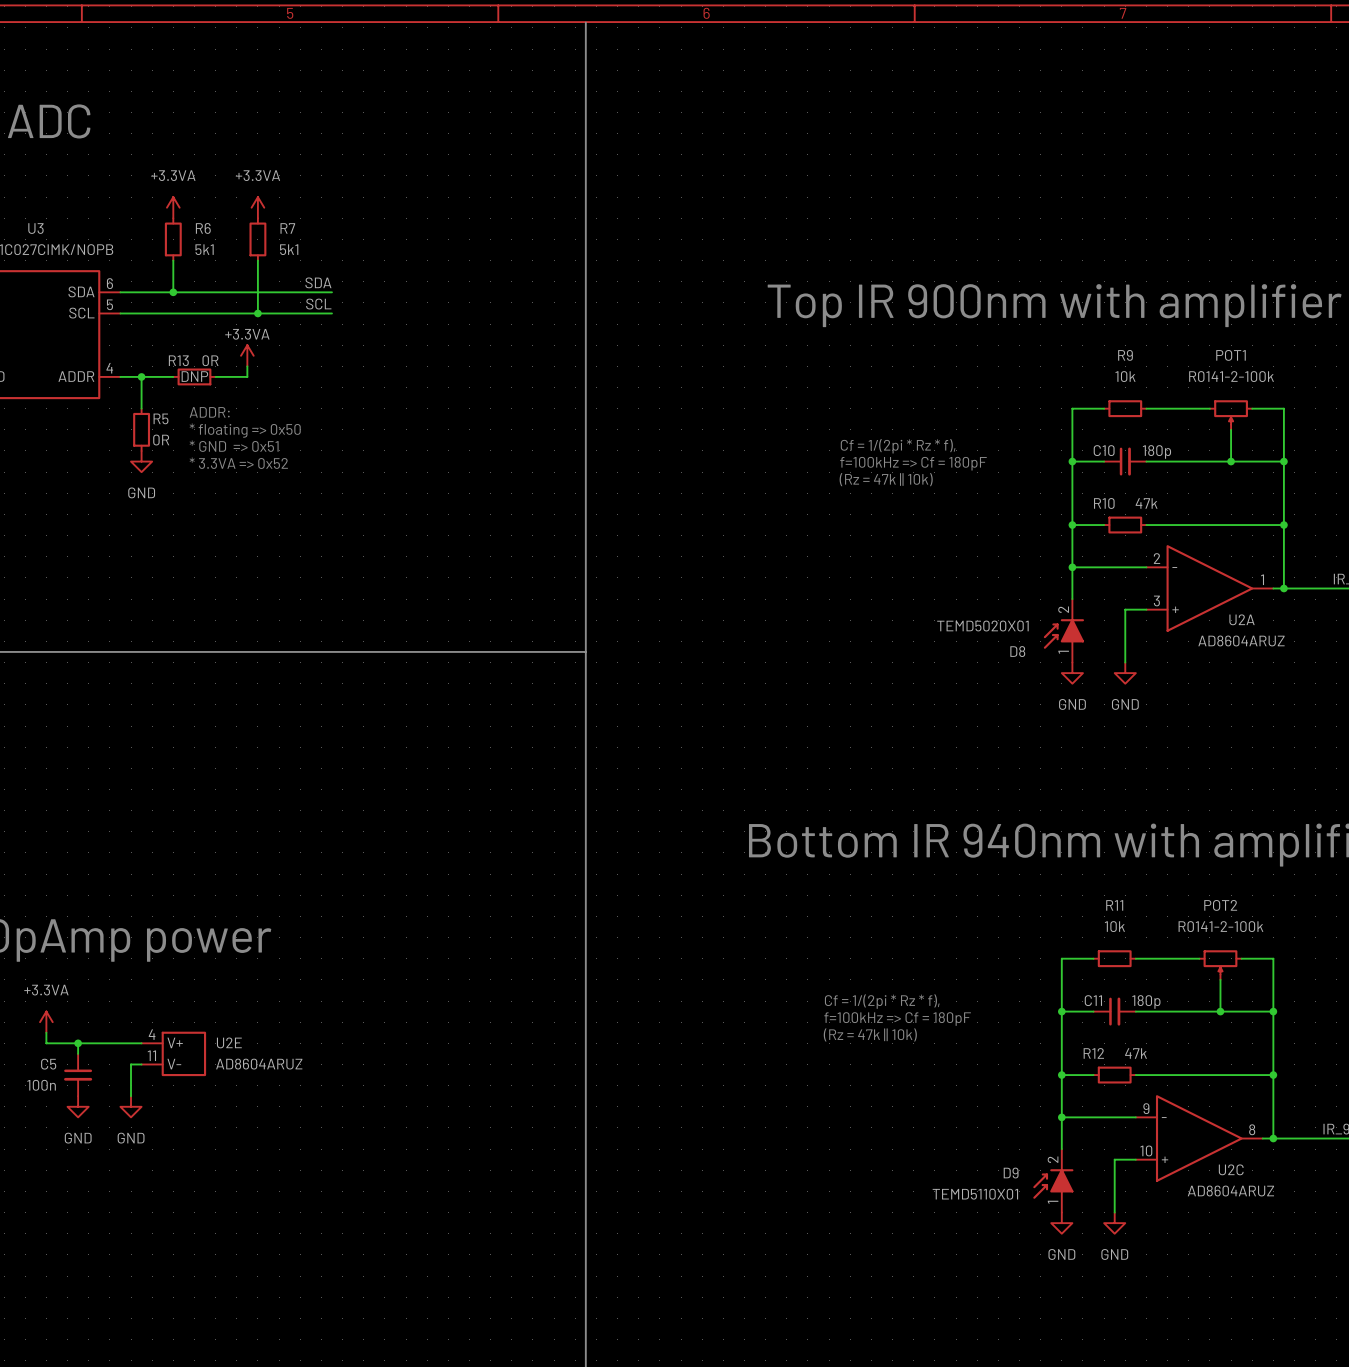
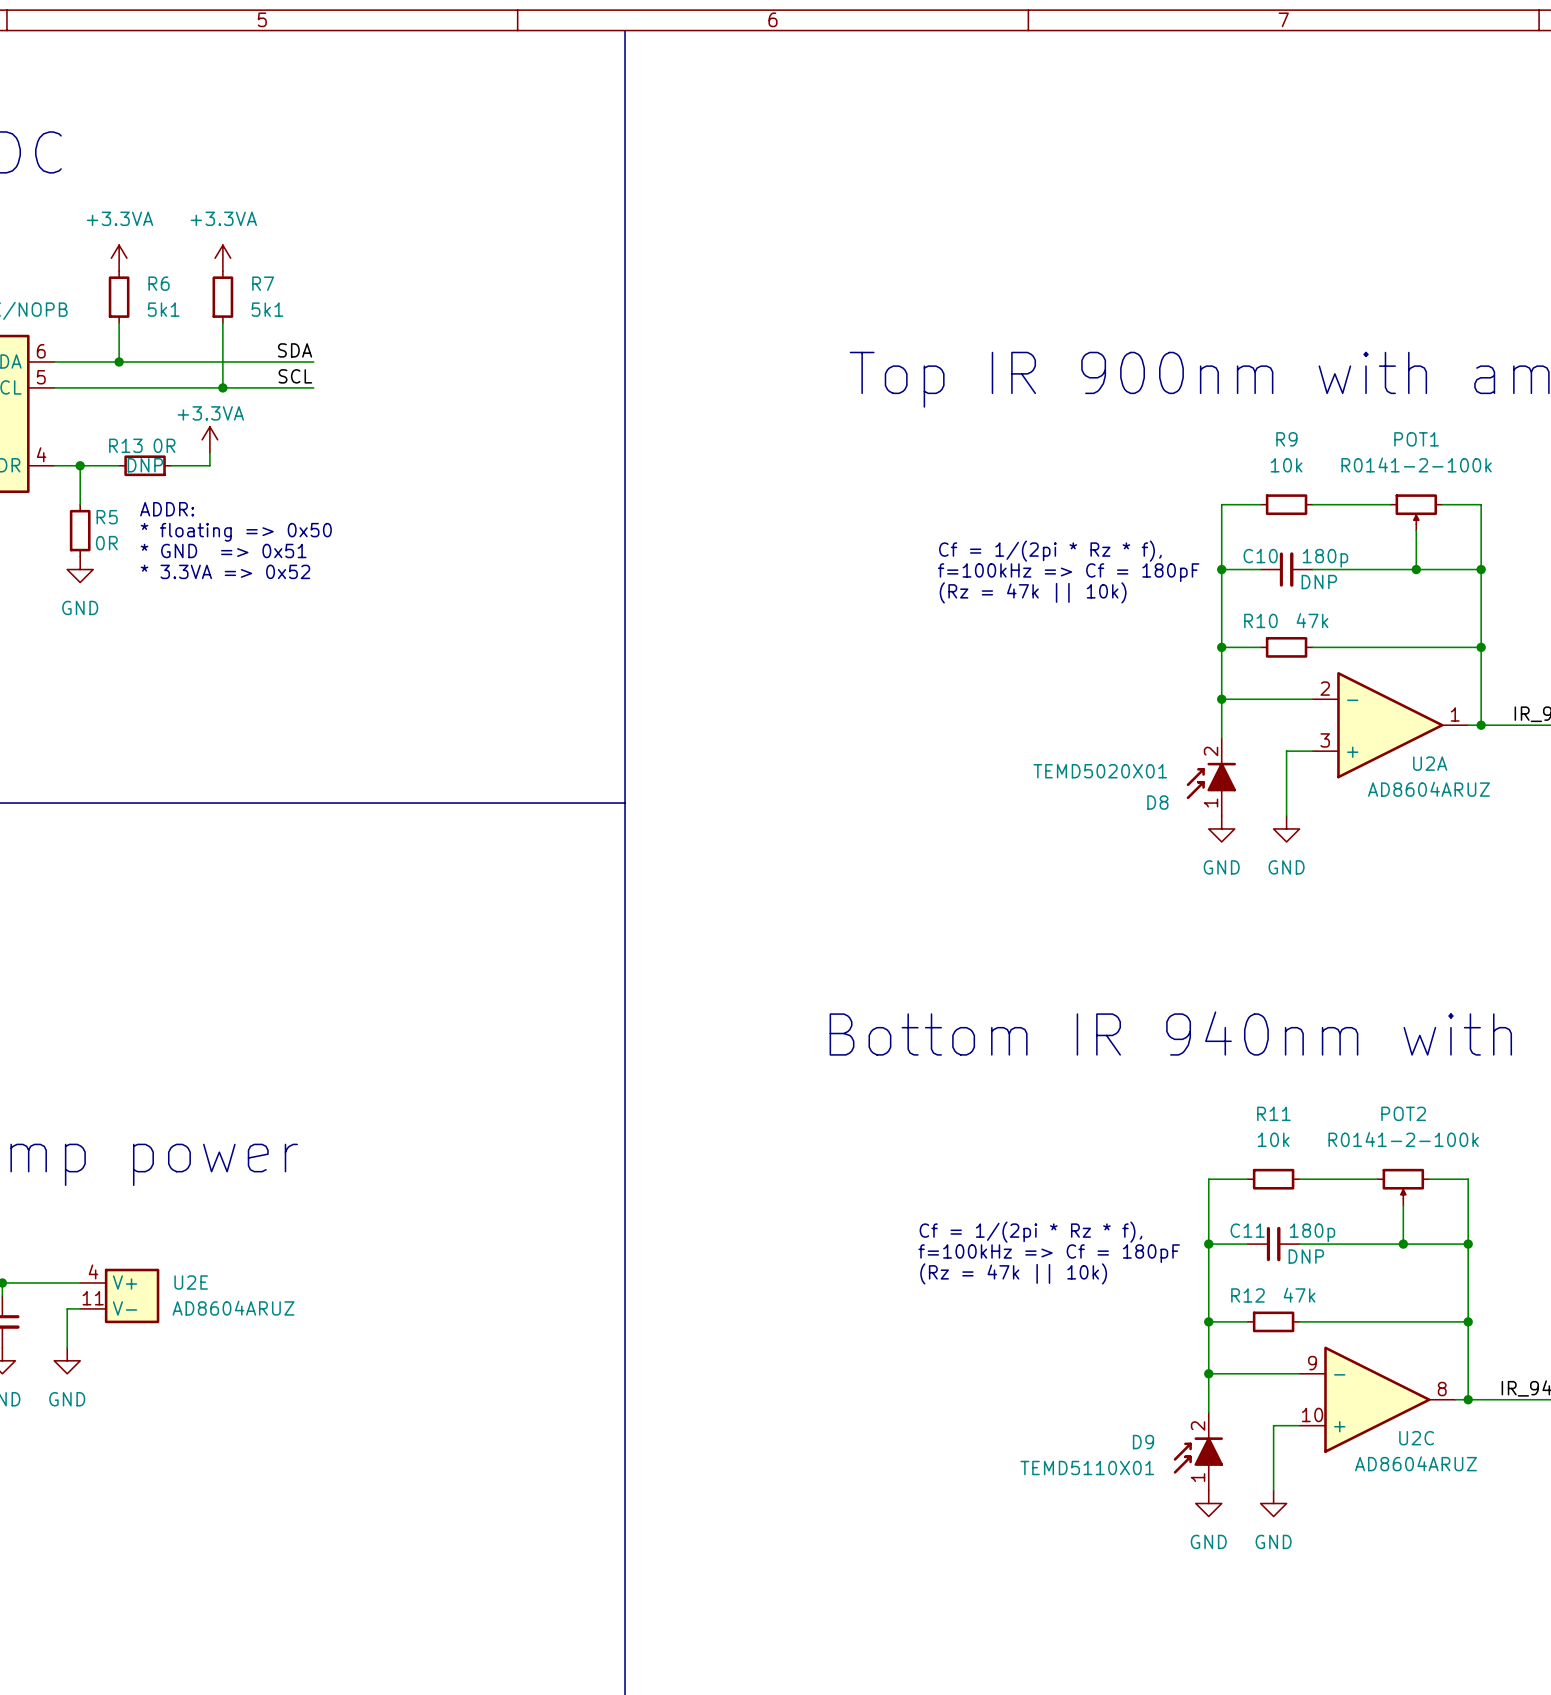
C10 text: none -> DNP (1319, 582)
C11 text: none -> DNP (1306, 1256)

